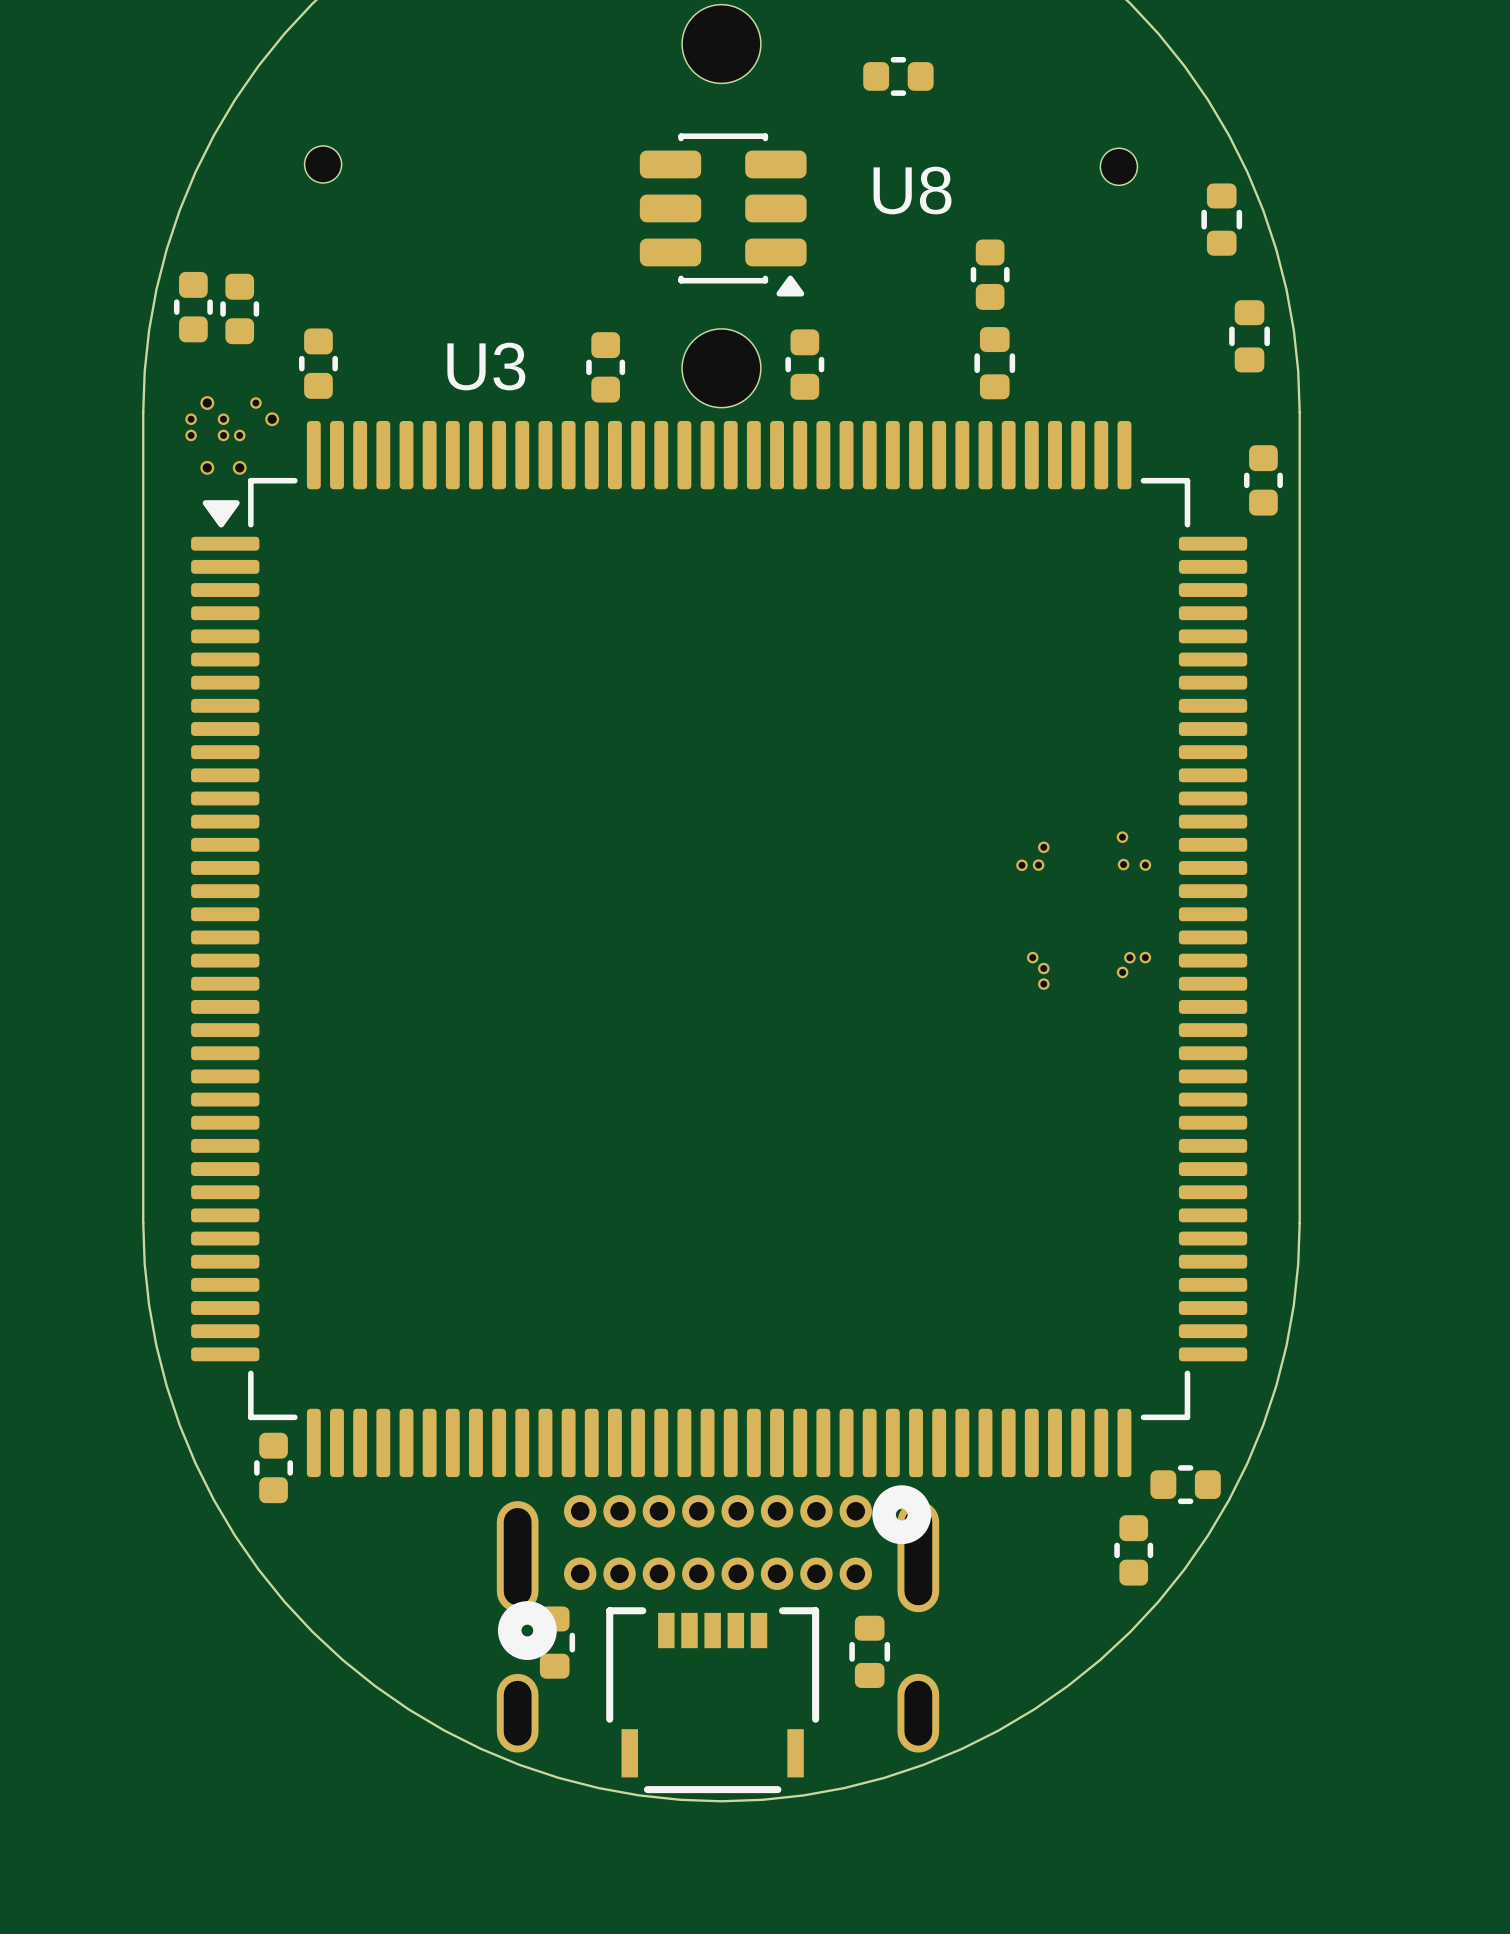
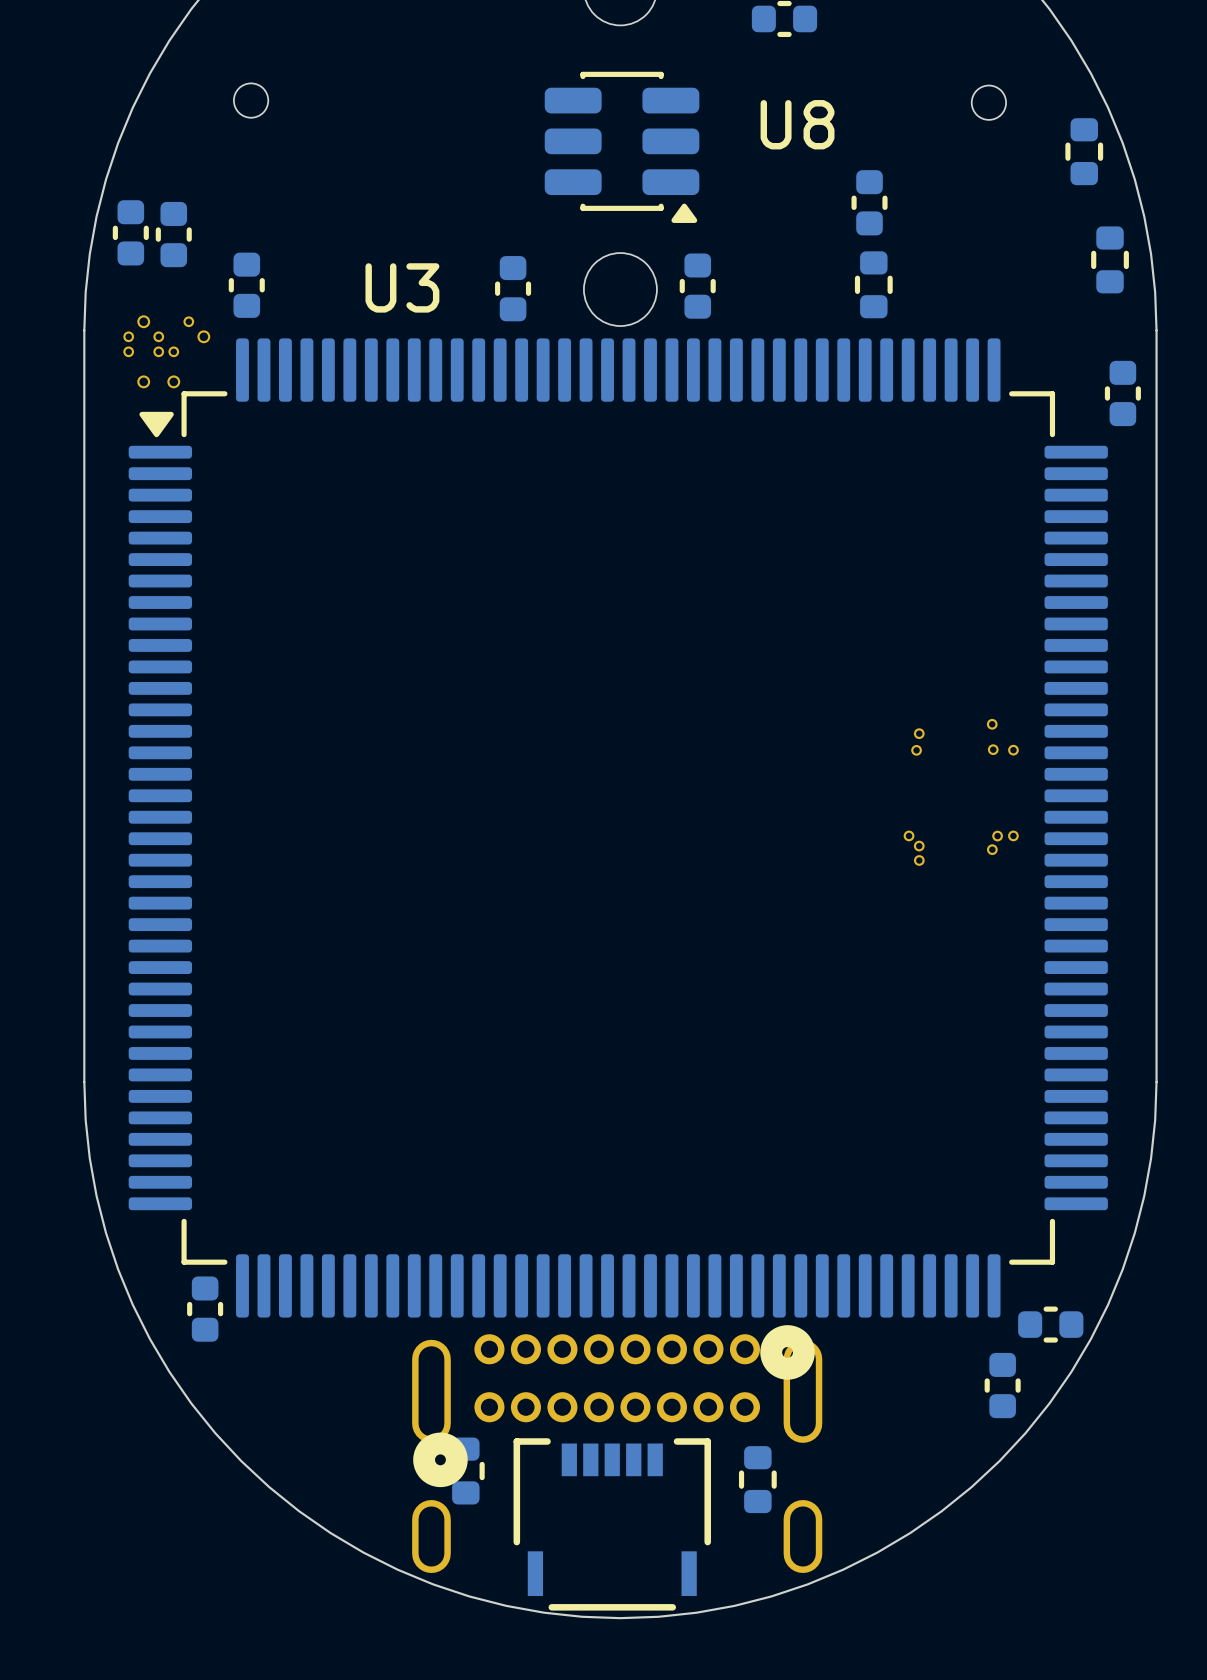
part footprint: [1016, 831, 1152, 990] -> [903, 718, 1019, 866]

